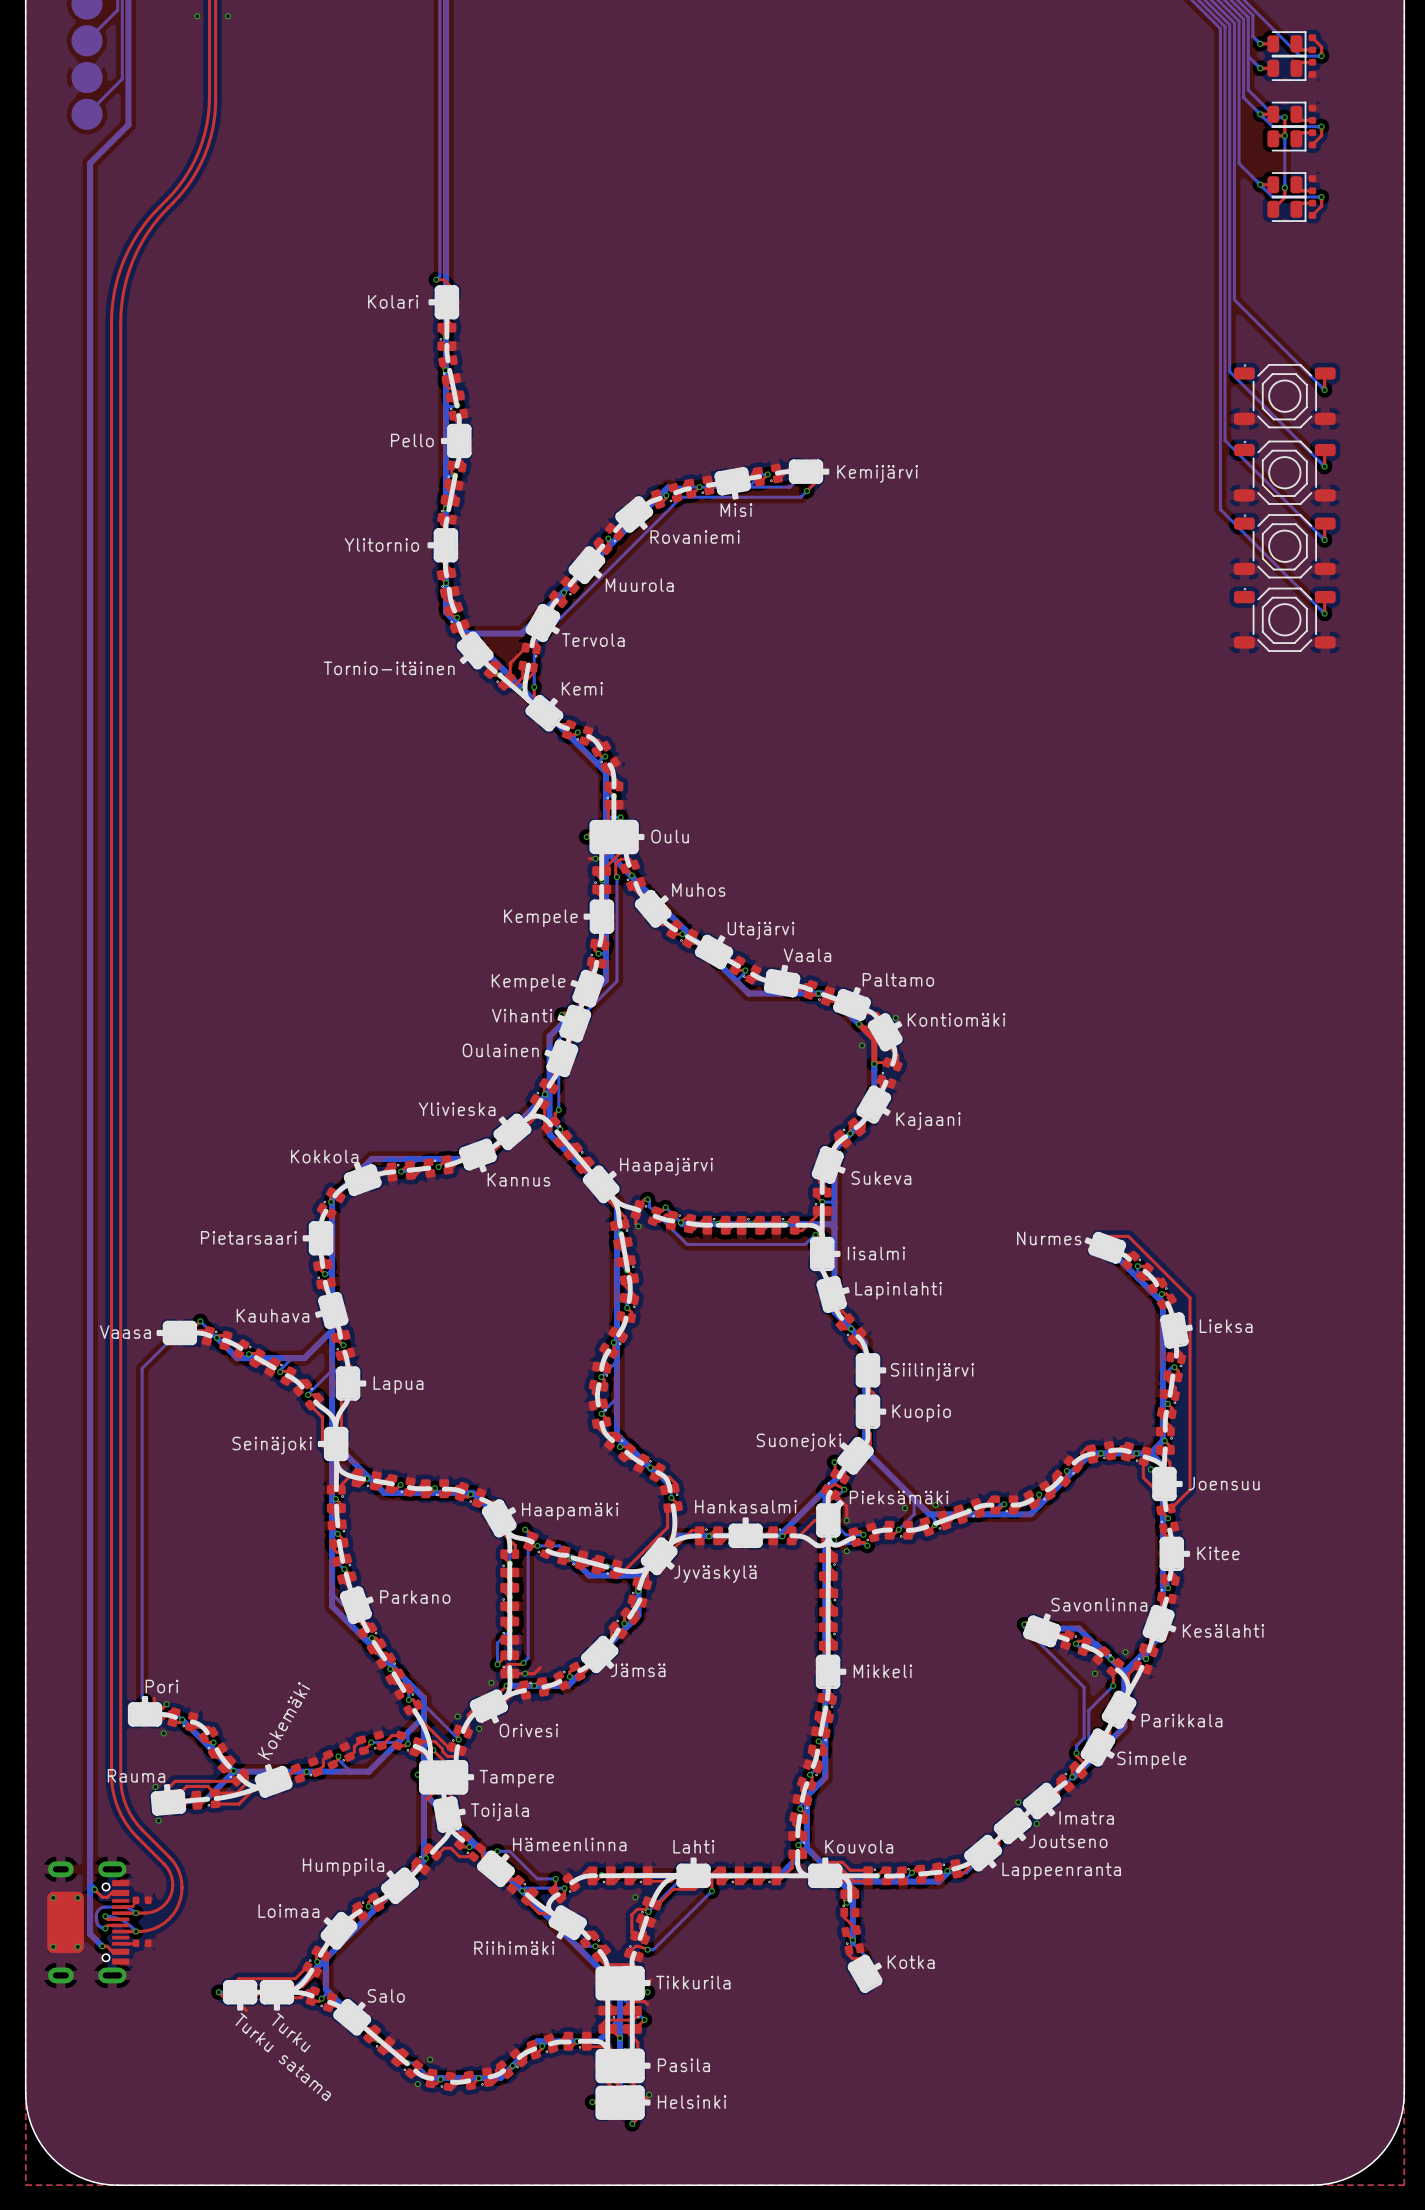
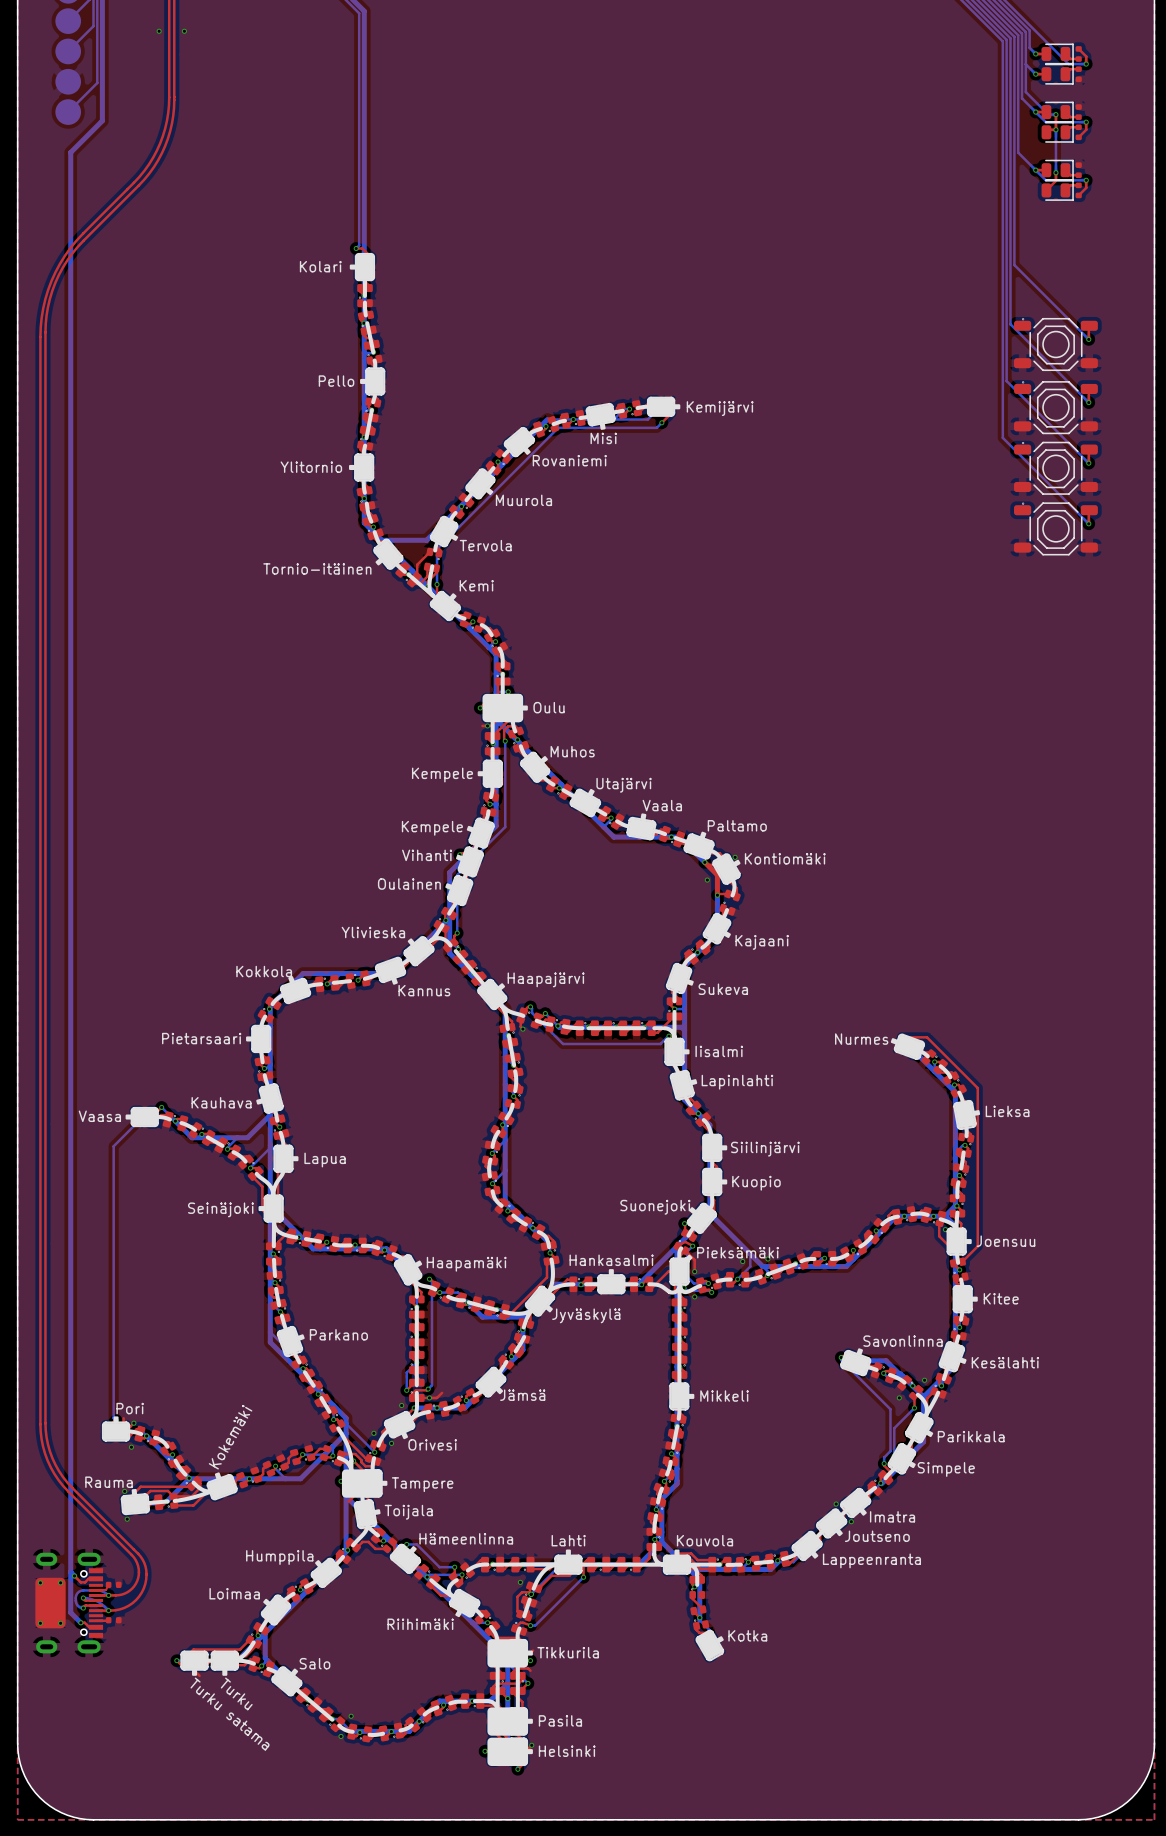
top track: (159, 207) (138, 232) (123, 260) (114, 290) (111, 322) (111, 1774) (112, 1788) (118, 1808) (128, 1826) (137, 1837) -> (127, 188) (76, 240) (60, 263) (45, 299) (40, 336) (40, 1431) (47, 1460) (58, 1480) (109, 1533)
top track: (168, 207) (148, 232) (133, 260) (123, 290) (120, 322) (120, 1777) (122, 1792) (129, 1812) (137, 1824) (173, 1861) (180, 1876) (181, 1887) -> (135, 188) (83, 240) (67, 260) (52, 290) (45, 323) (45, 1423) (49, 1451) (62, 1476) (140, 1556) (146, 1573)

